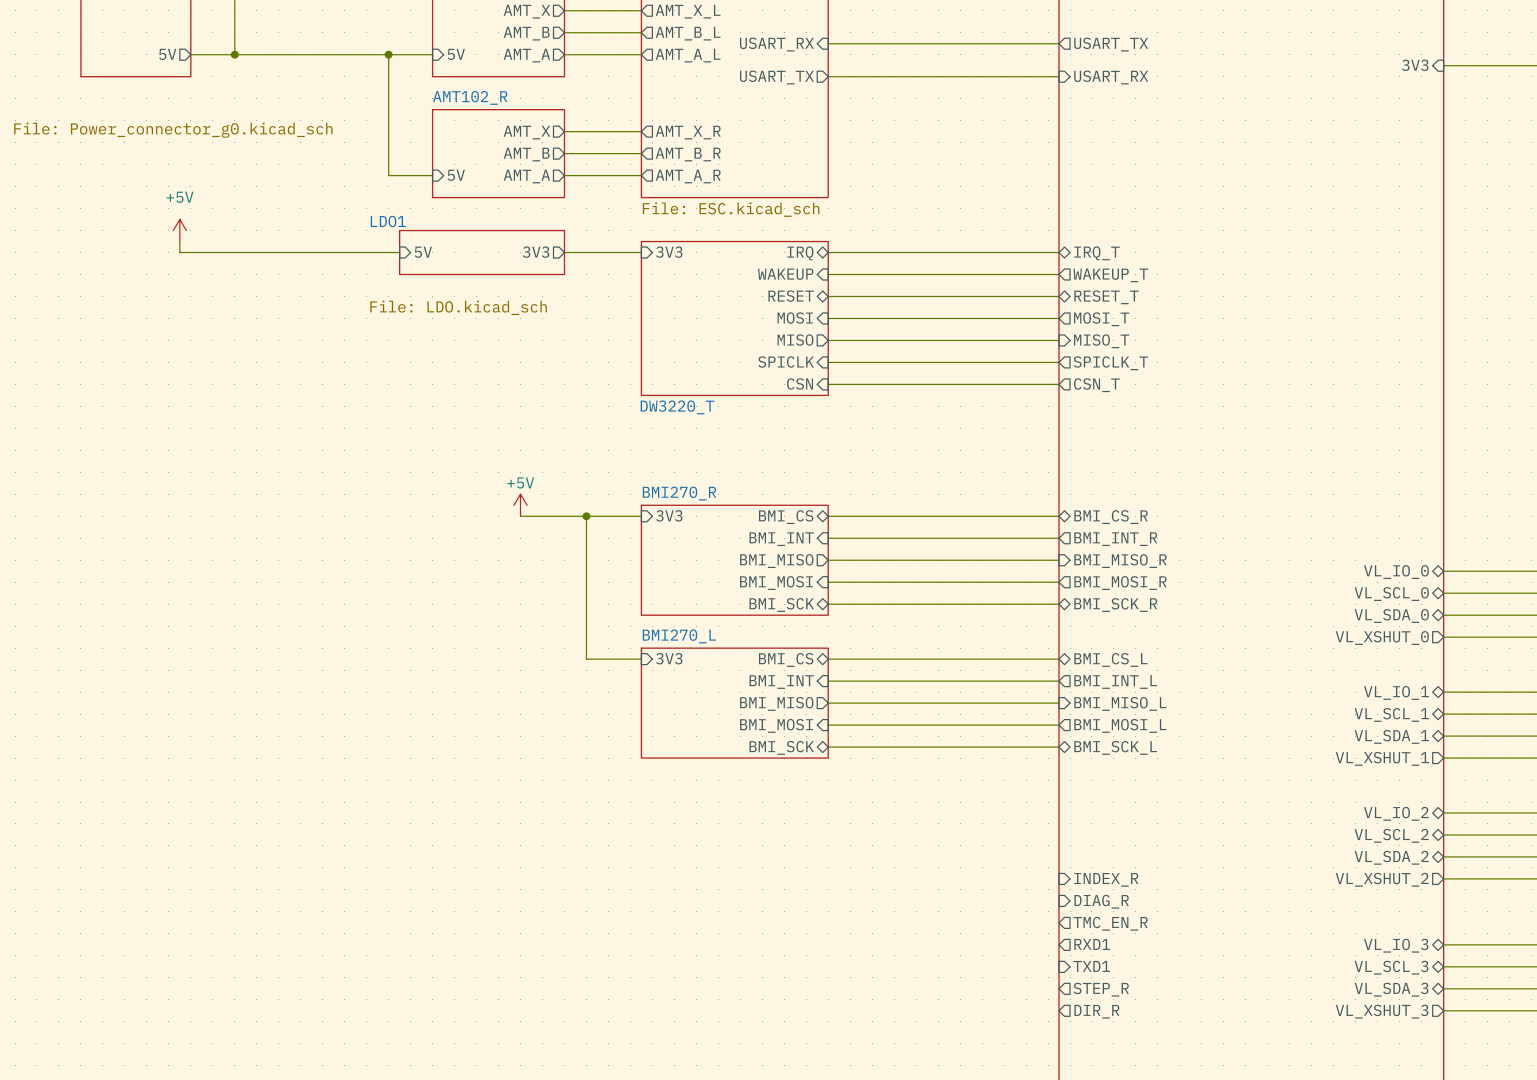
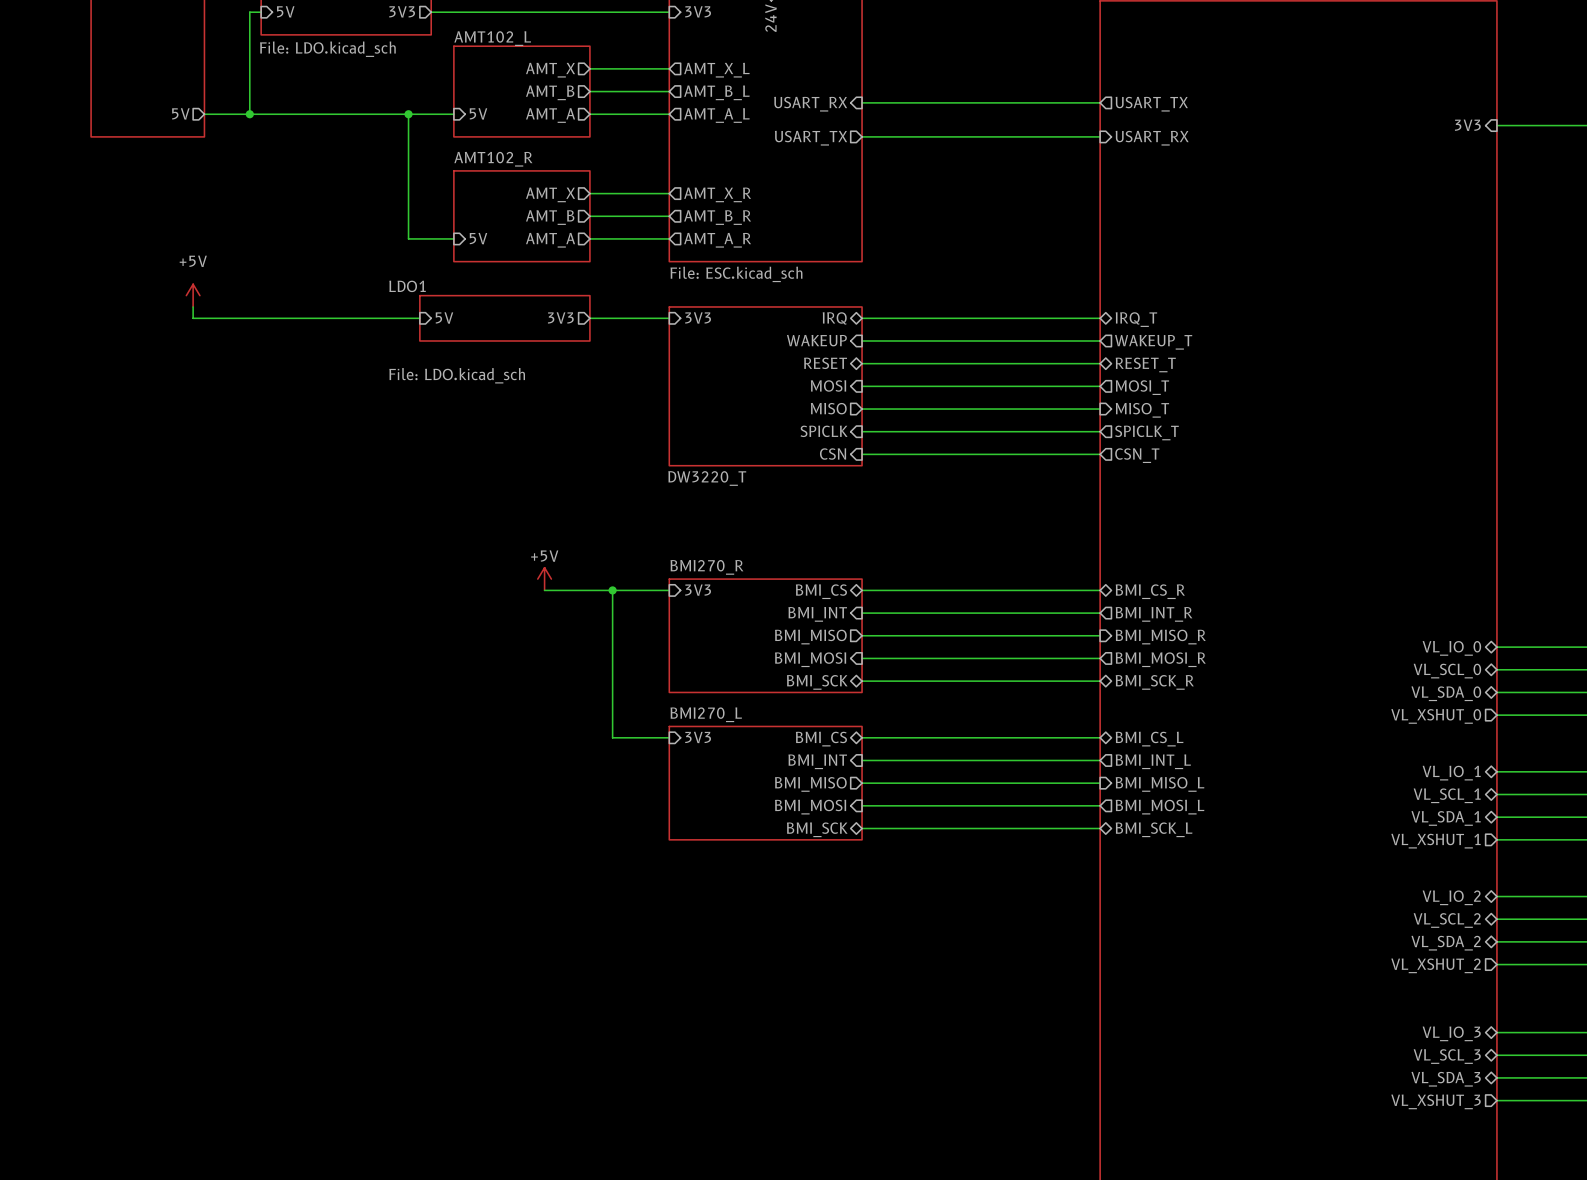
sheet value: File: Power_connector_g0.kicad_sch (173, 130) -> none
sheet pin: INDEX_R (1106, 879) -> none
sheet pin: DIAG_R (1101, 901) -> none
sheet pin: TMC_EN_R (1110, 923) -> none
sheet pin: RXD1 (1092, 944) -> none
sheet pin: TXD1 (1091, 966) -> none
sheet pin: STEP_R (1101, 989) -> none
sheet pin: DIR_R (1096, 1011) -> none

